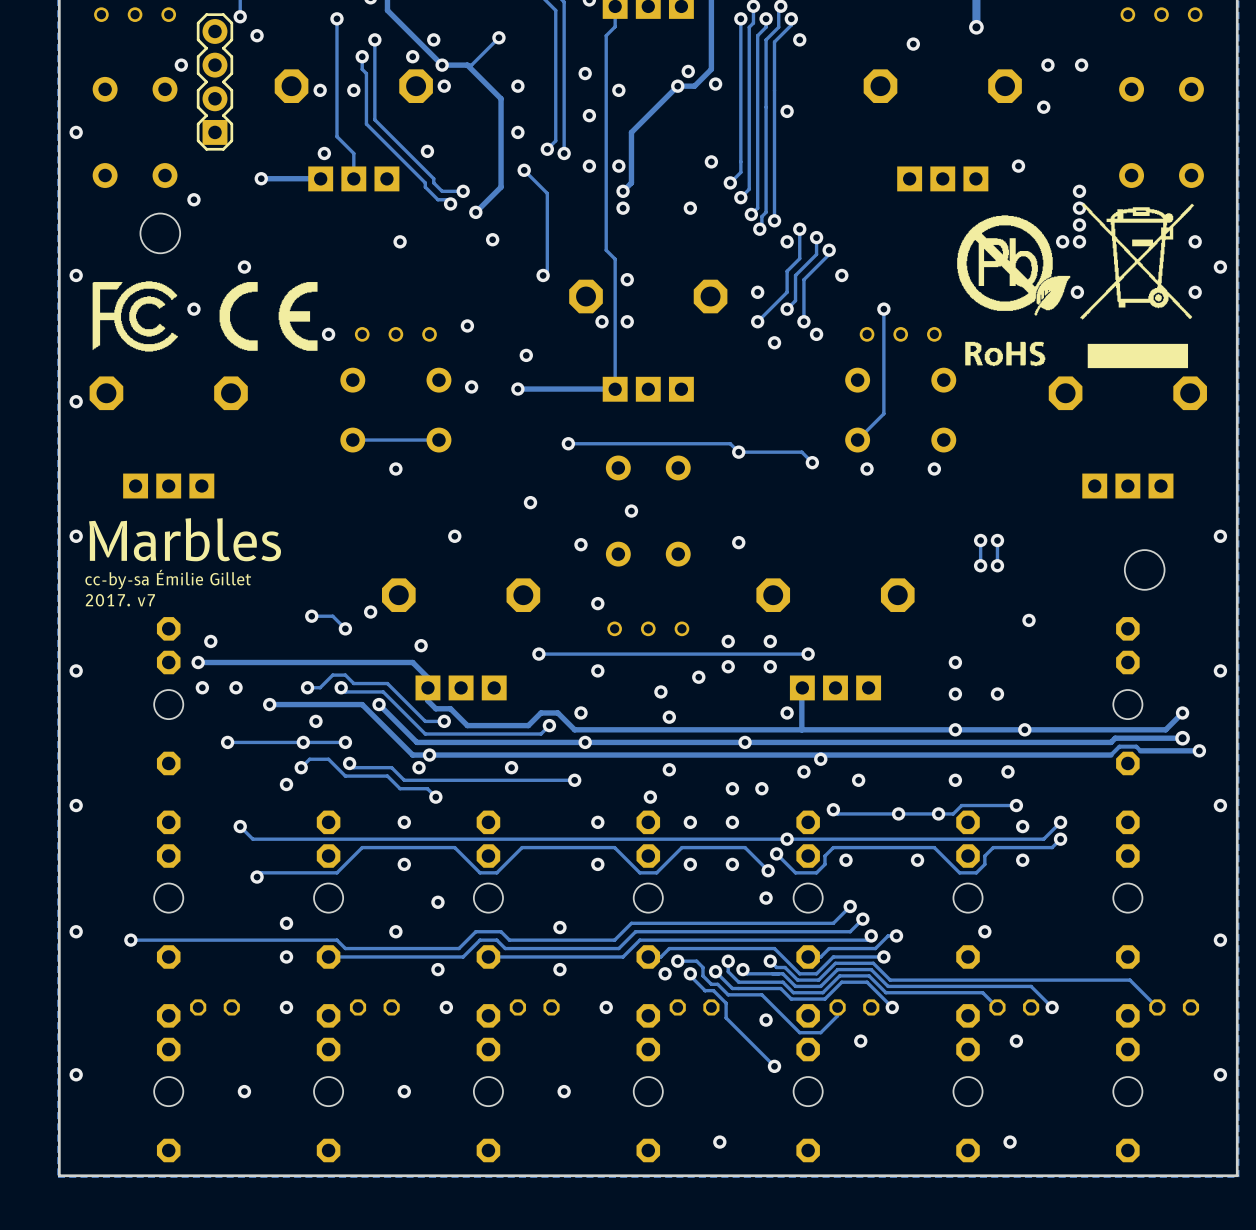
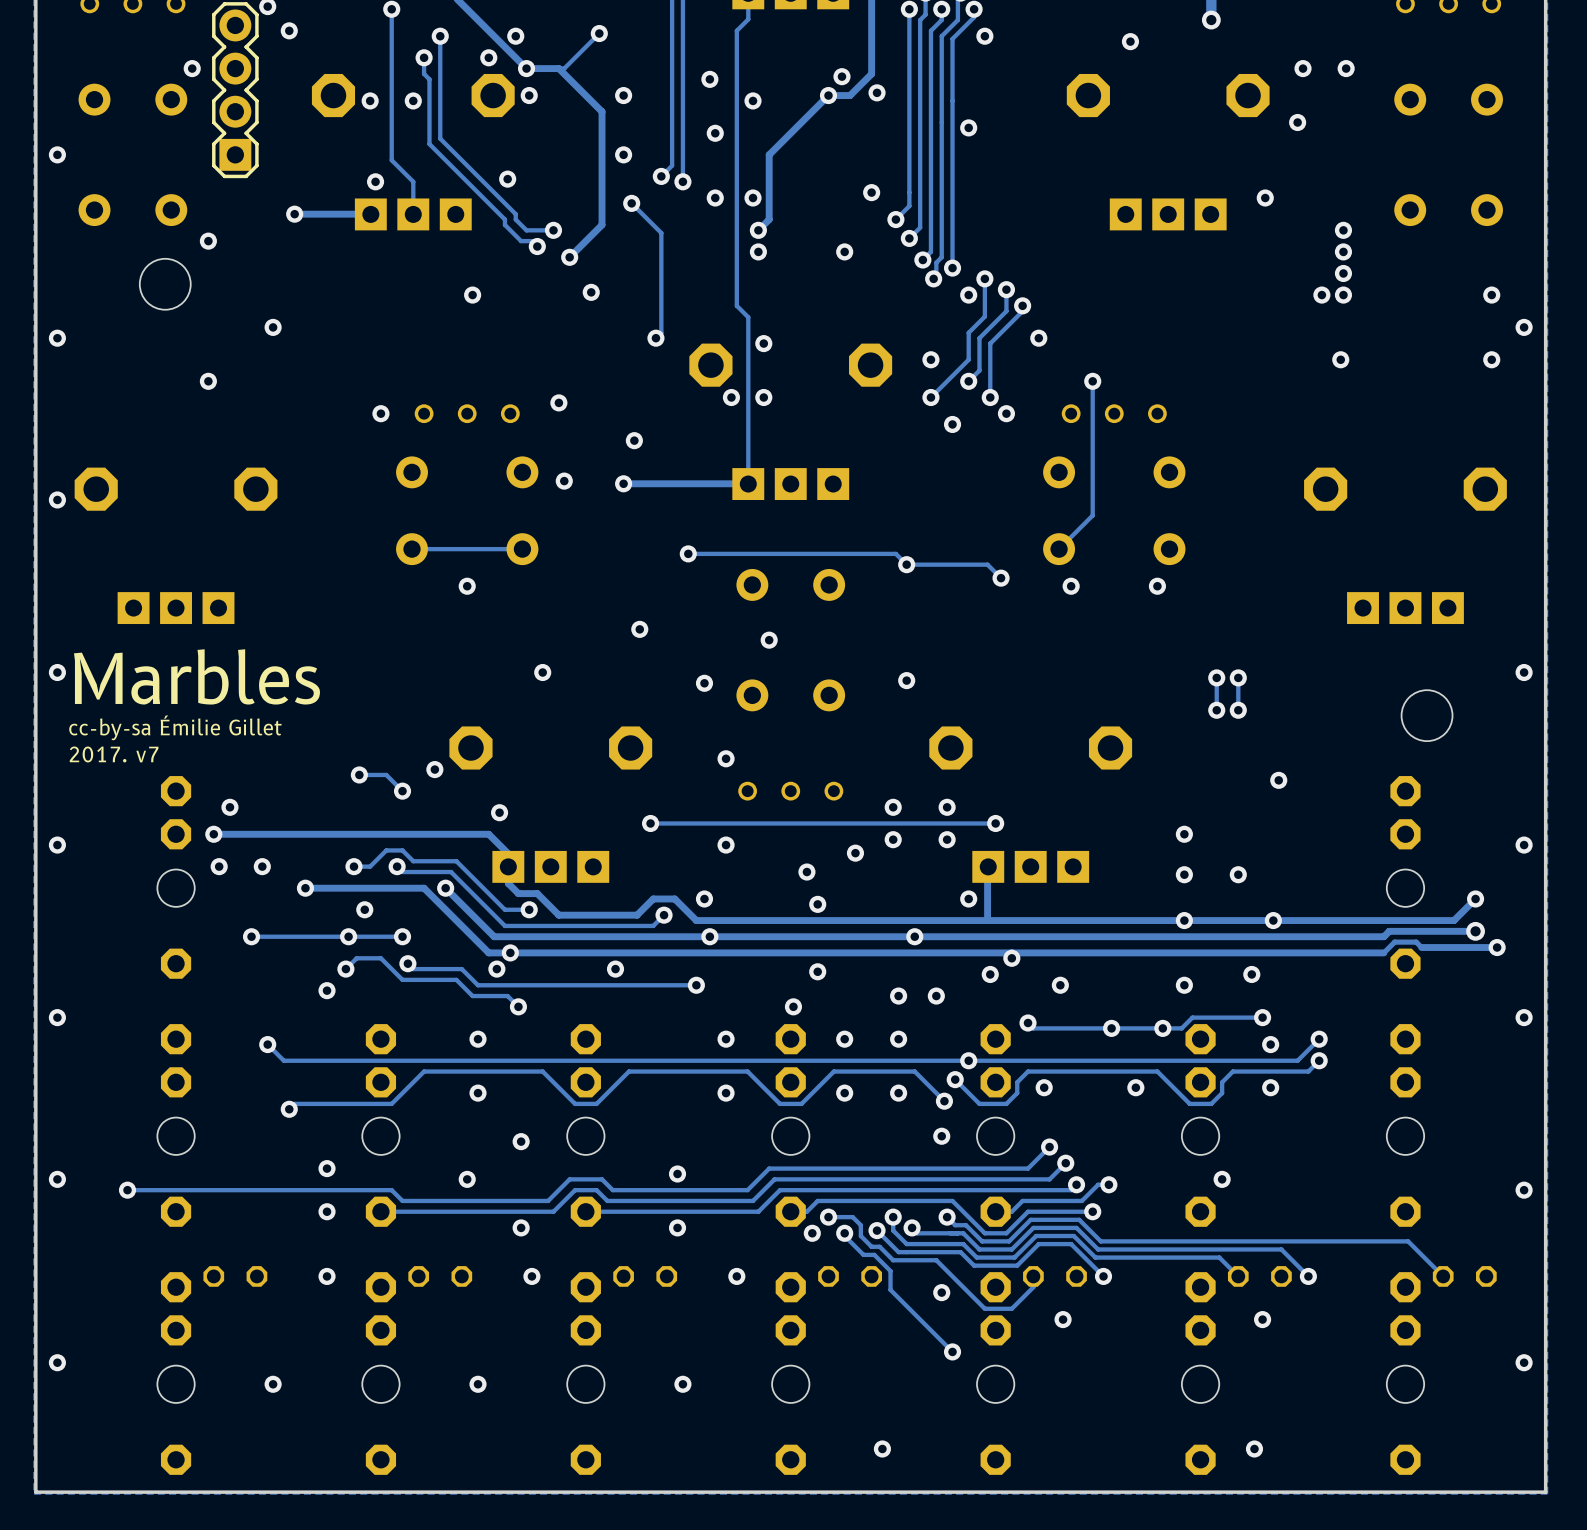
drawing: [957, 203, 1195, 369] -> none
drawing: [92, 281, 178, 352] -> none
drawing: [219, 282, 318, 351] -> none

